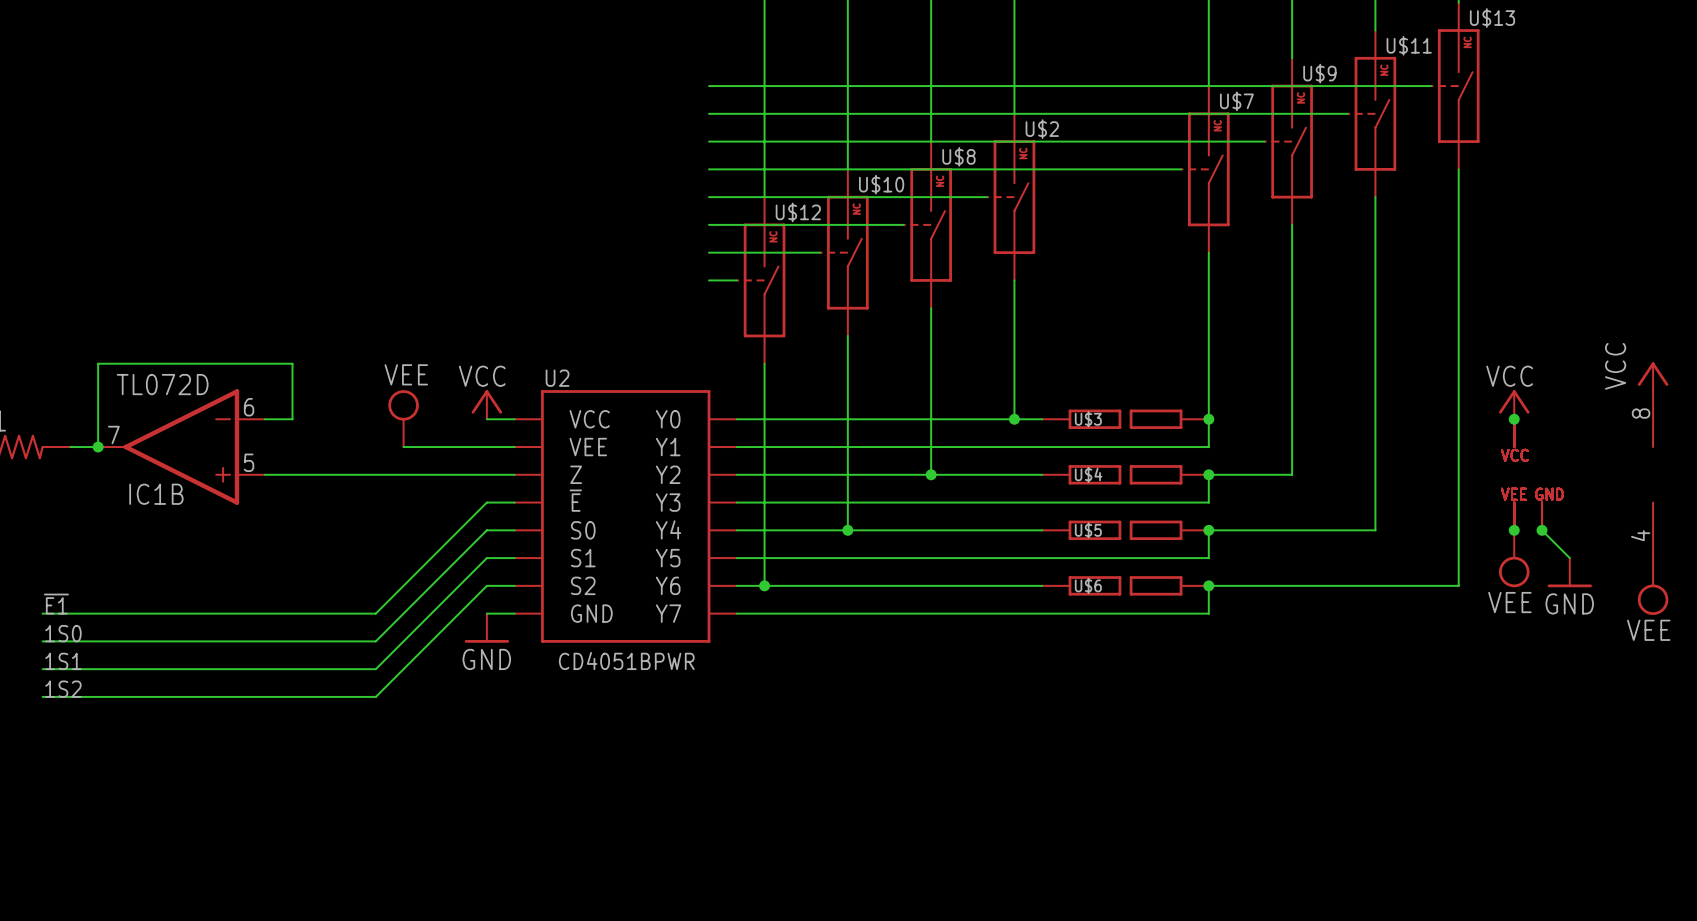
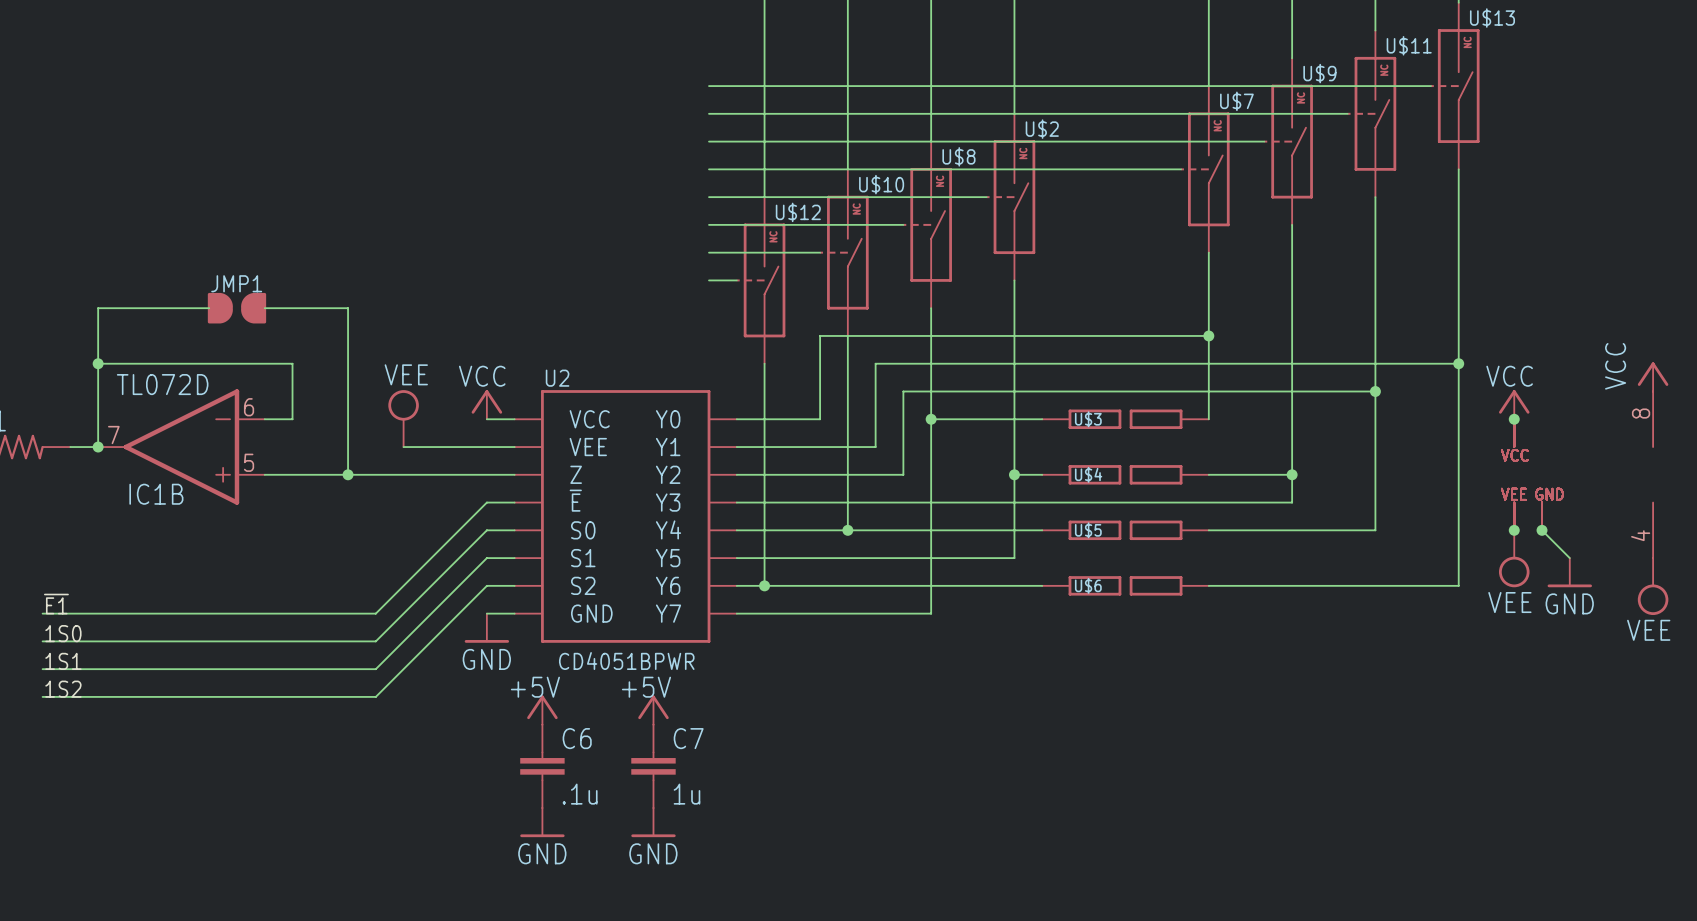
wire: none -> (209, 308) (98, 308) (98, 363)
JMP1: none -> (236, 308)
wire: none -> (264, 308) (348, 308) (348, 474)
junction: none -> (1208, 335)
junction: none -> (98, 363)
junction: none -> (1458, 363)
junction: none -> (1375, 391)
wire: (820, 419) (931, 419) -> (820, 419) (820, 335) (1208, 335)
junction: none -> (931, 419)
junction: (1014, 419) -> none
wire: (1208, 419) (1208, 447) (875, 447) -> (1458, 363) (875, 363) (875, 447)
junction: (1208, 419) -> none
junction: none -> (348, 474)
wire: (903, 474) (1014, 474) -> (903, 474) (903, 391) (1375, 391)
junction: (931, 474) -> none
junction: none -> (1014, 474)
wire: (1208, 474) (1208, 502) -> (1292, 474) (1292, 502) (1208, 502)
junction: (1208, 474) -> none
junction: none -> (1292, 474)
wire: (1208, 530) (1208, 558) (1014, 558) -> (1014, 419) (1014, 558)
junction: (1208, 530) -> none
wire: (1208, 585) (1208, 613) (931, 613) -> (931, 474) (931, 613)
junction: (1208, 585) -> none
power symbol: none -> +5V (542, 710)
power symbol: none -> +5V (653, 710)
C6: none -> .1u (542, 766)
C7: none -> 1u (653, 766)
power symbol: none -> GND (542, 822)
power symbol: none -> GND (653, 822)

